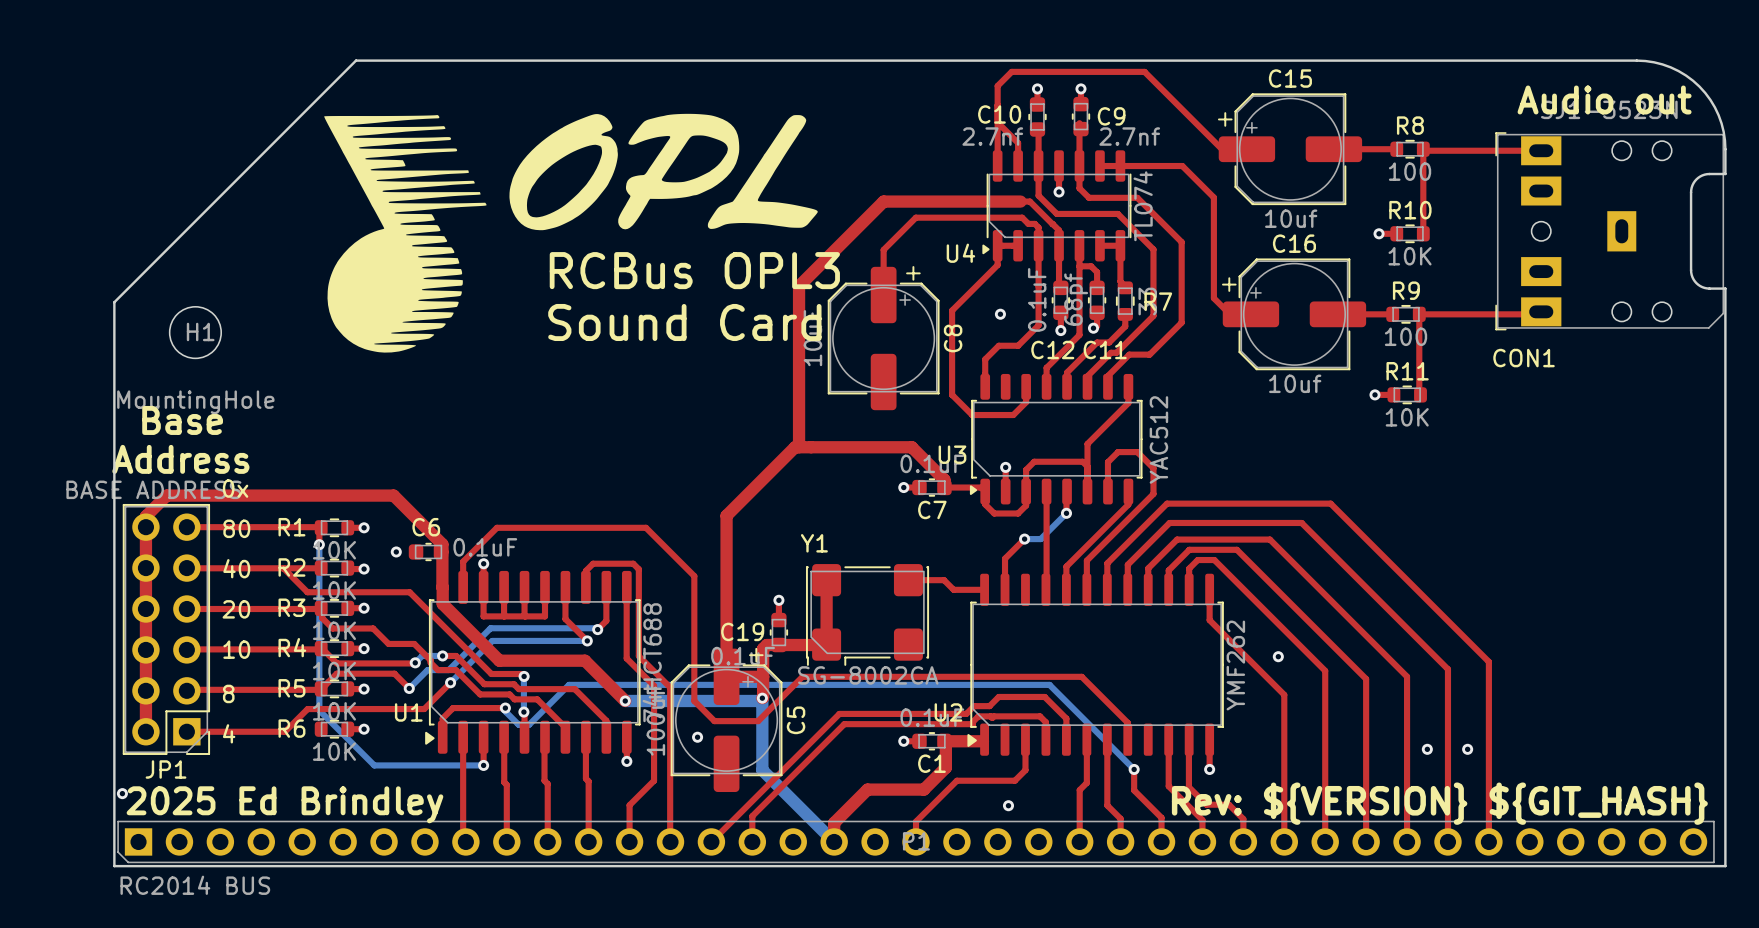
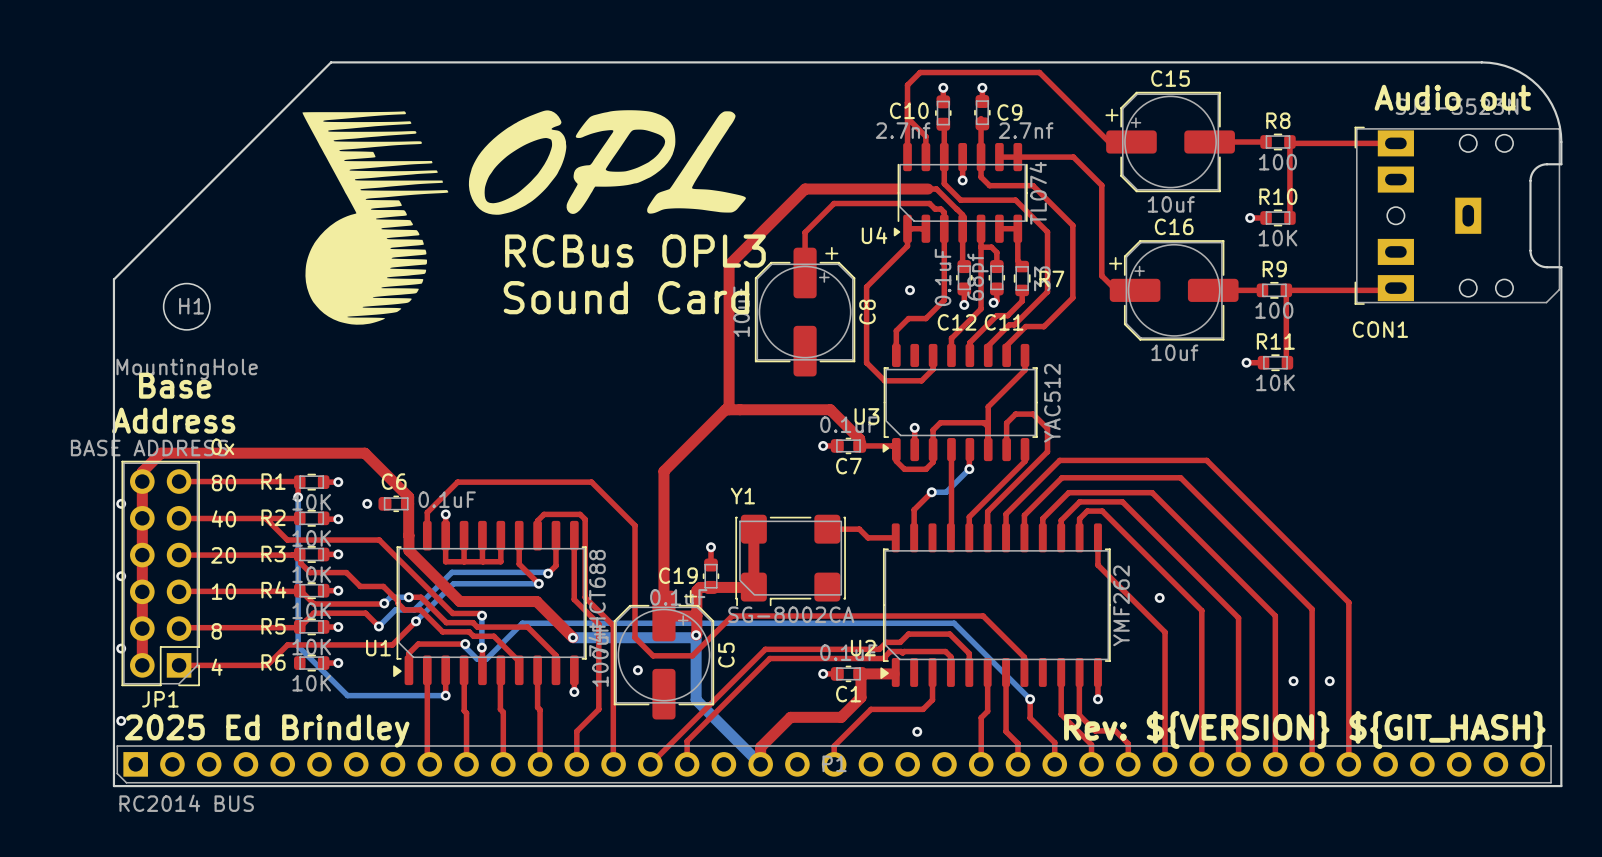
via: none -> (121, 503)
via: none -> (121, 576)
via: none -> (121, 648)

